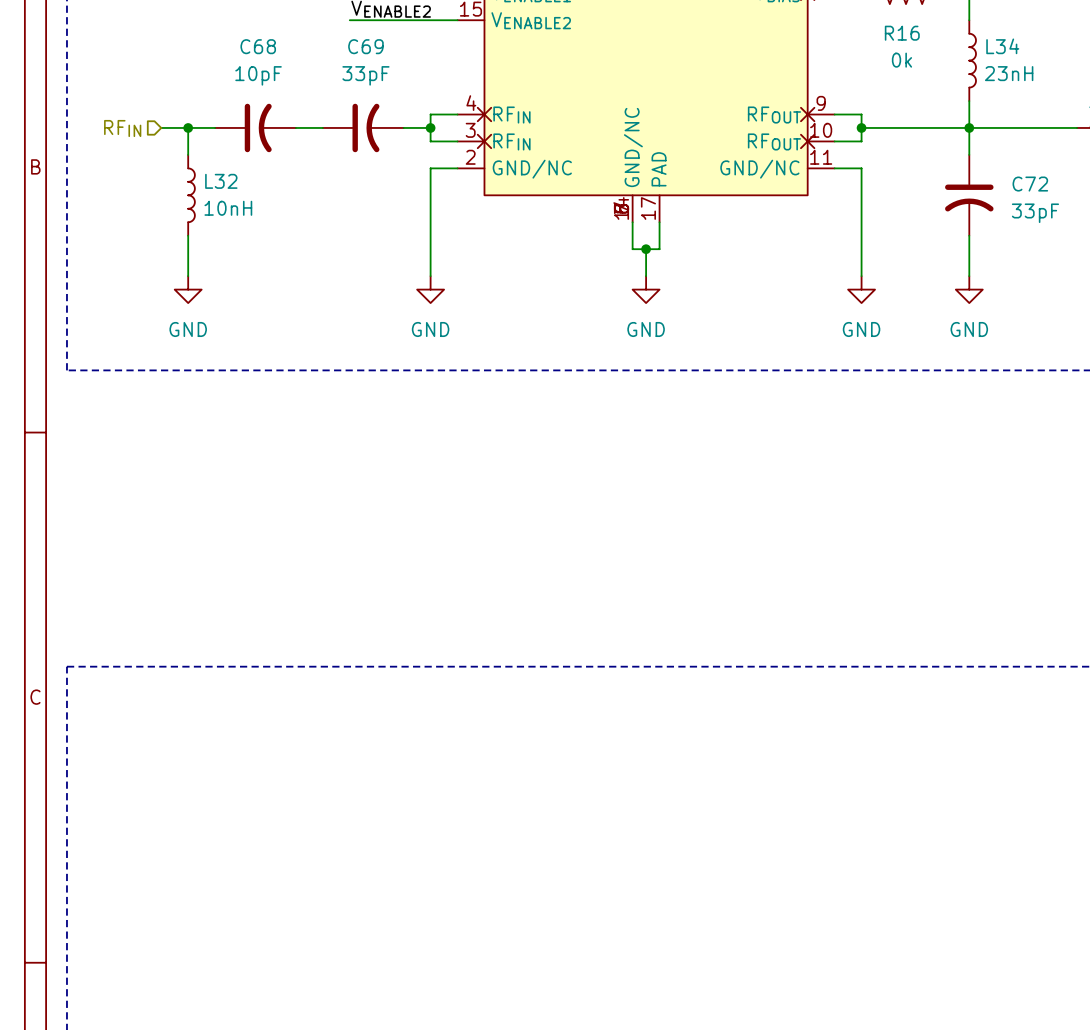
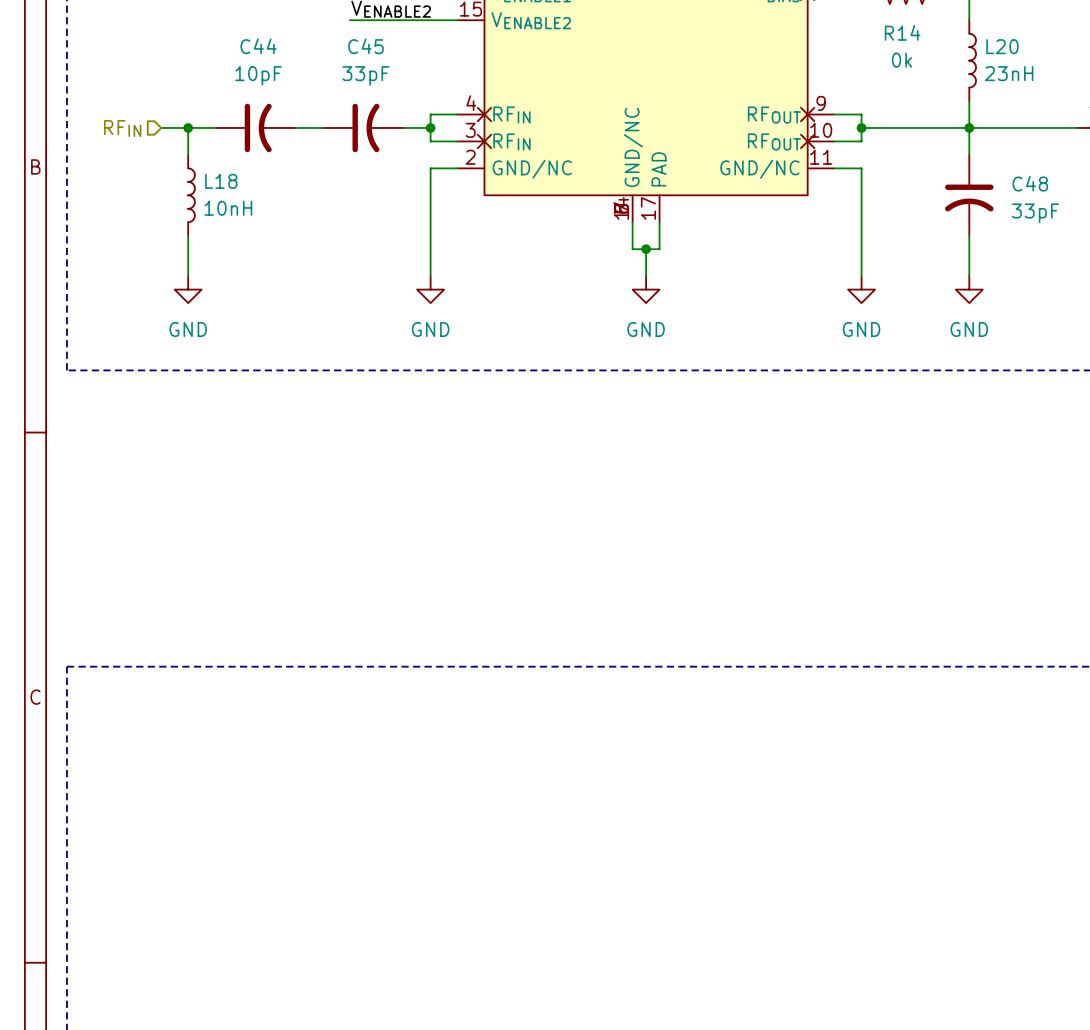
R16 name: R16 (902, 33) -> R14 (902, 32)
C68 name: C68 (258, 46) -> C44 (258, 46)
C69 name: C69 (365, 46) -> C45 (365, 46)
L34 name: L34 (1002, 46) -> L20 (1002, 46)
L32 name: L32 (221, 181) -> L18 (221, 181)
C72 name: C72 (1030, 184) -> C48 (1030, 183)

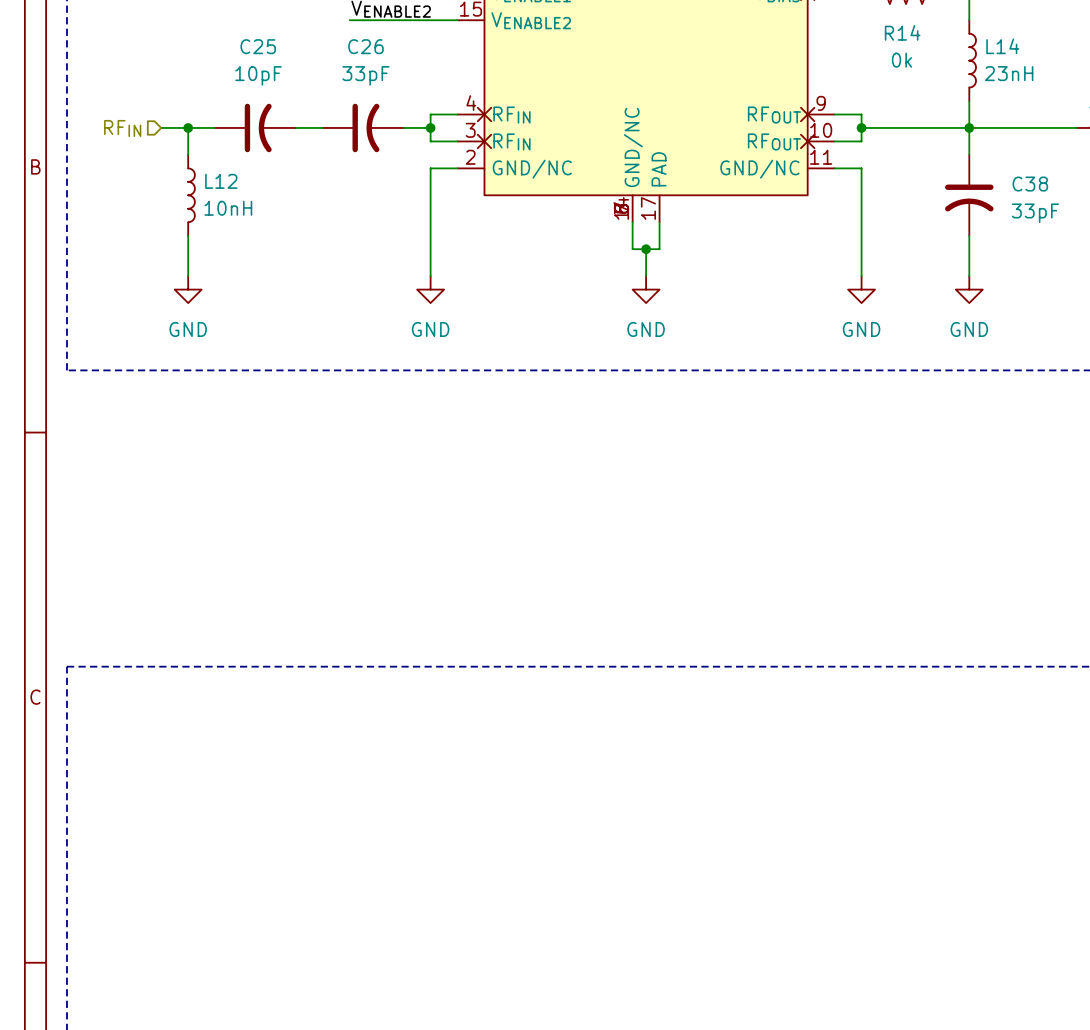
C44 name: C44 (258, 46) -> C25 (258, 46)
C45 name: C45 (365, 46) -> C26 (365, 46)
L20 name: L20 (1002, 46) -> L14 (1002, 46)
L18 name: L18 (221, 181) -> L12 (221, 181)
C48 name: C48 (1030, 183) -> C38 (1030, 184)

